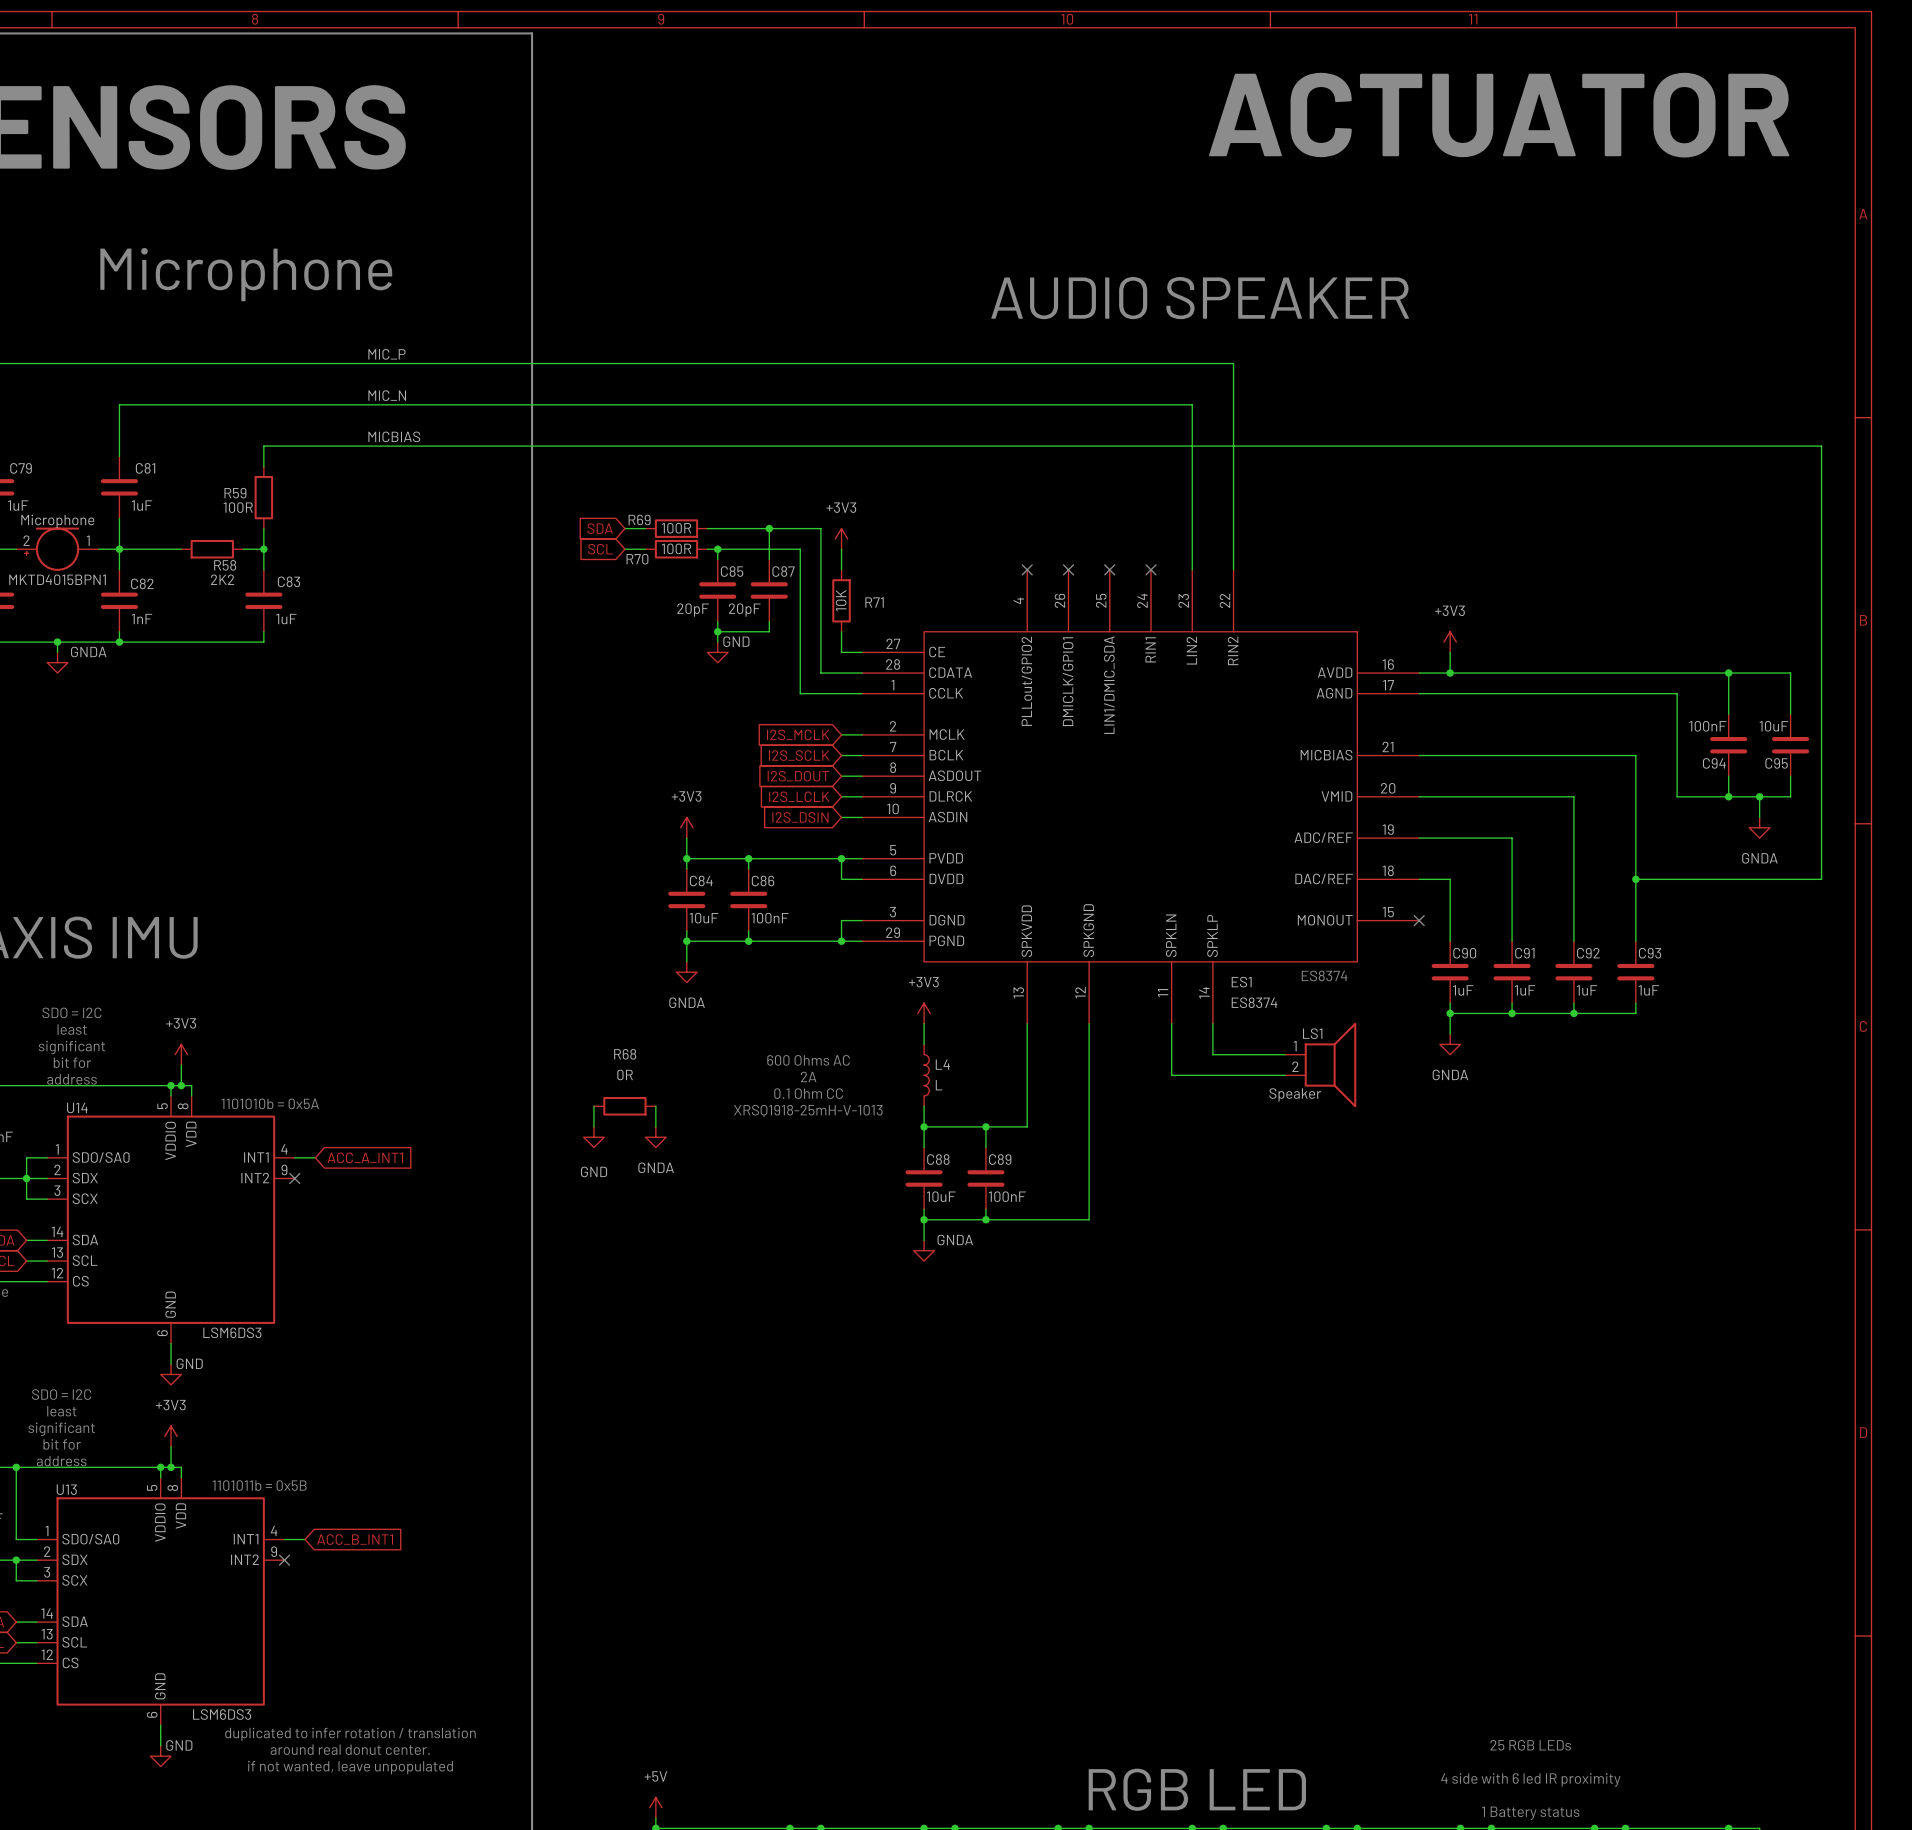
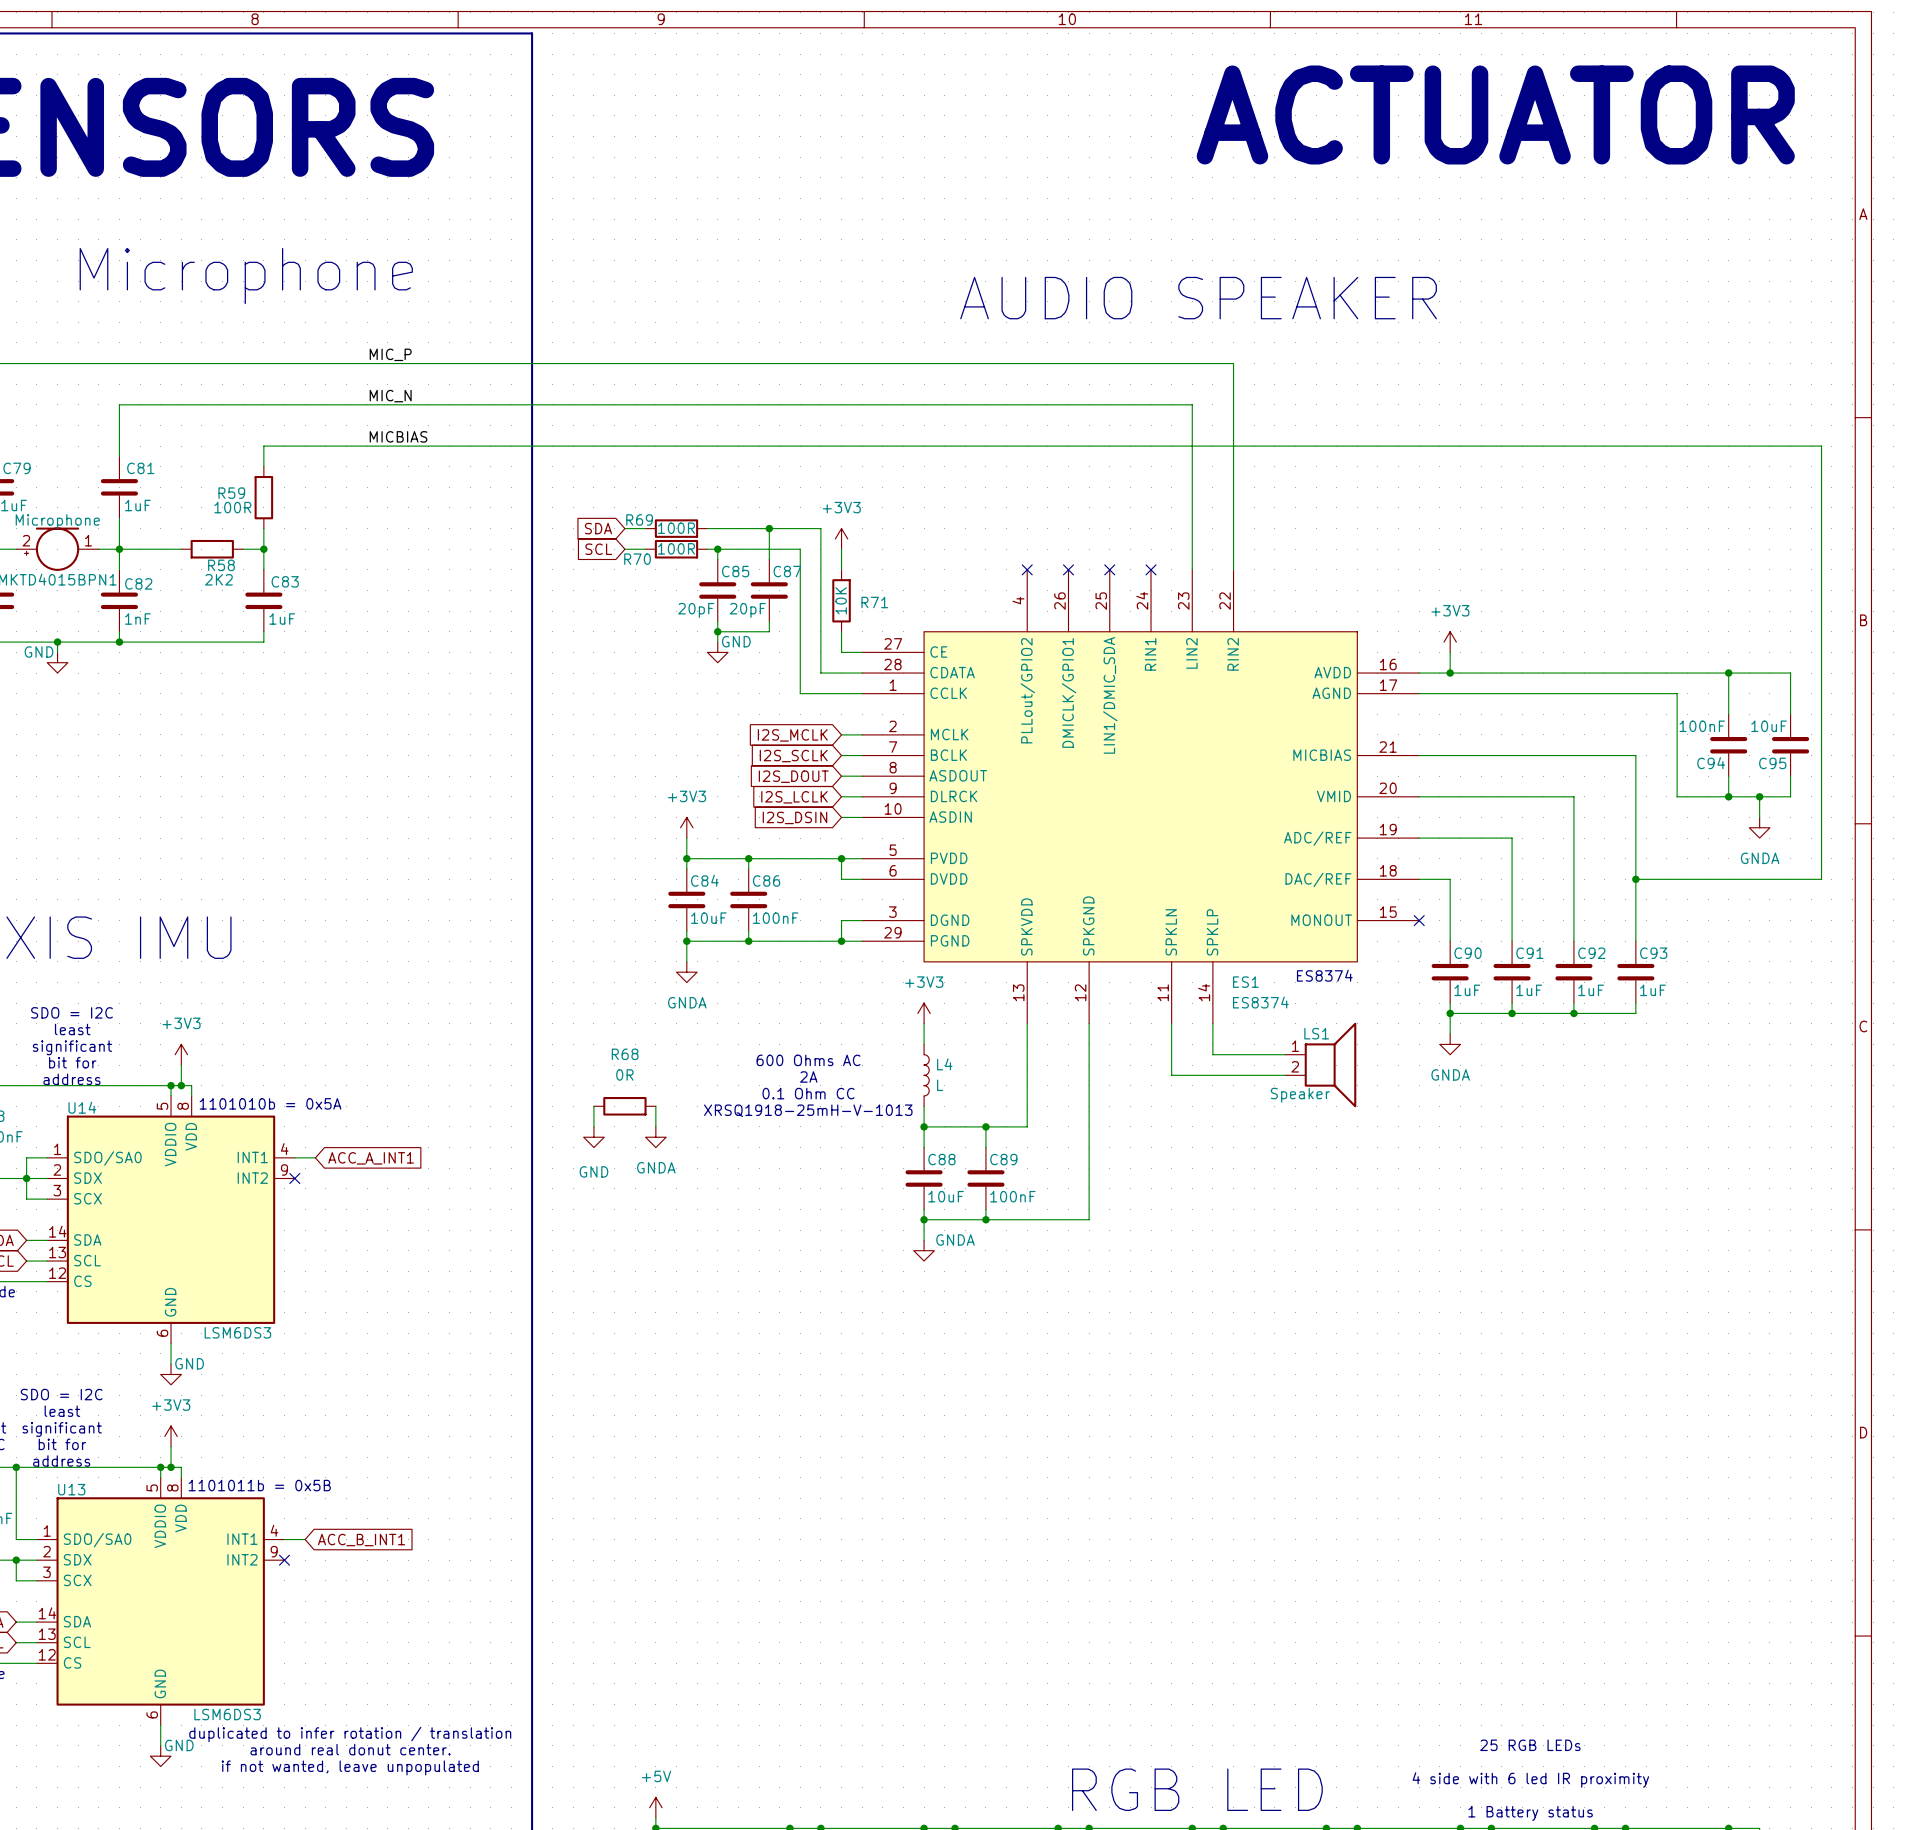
power symbol: GNDA (57, 662) -> GND (57, 662)

